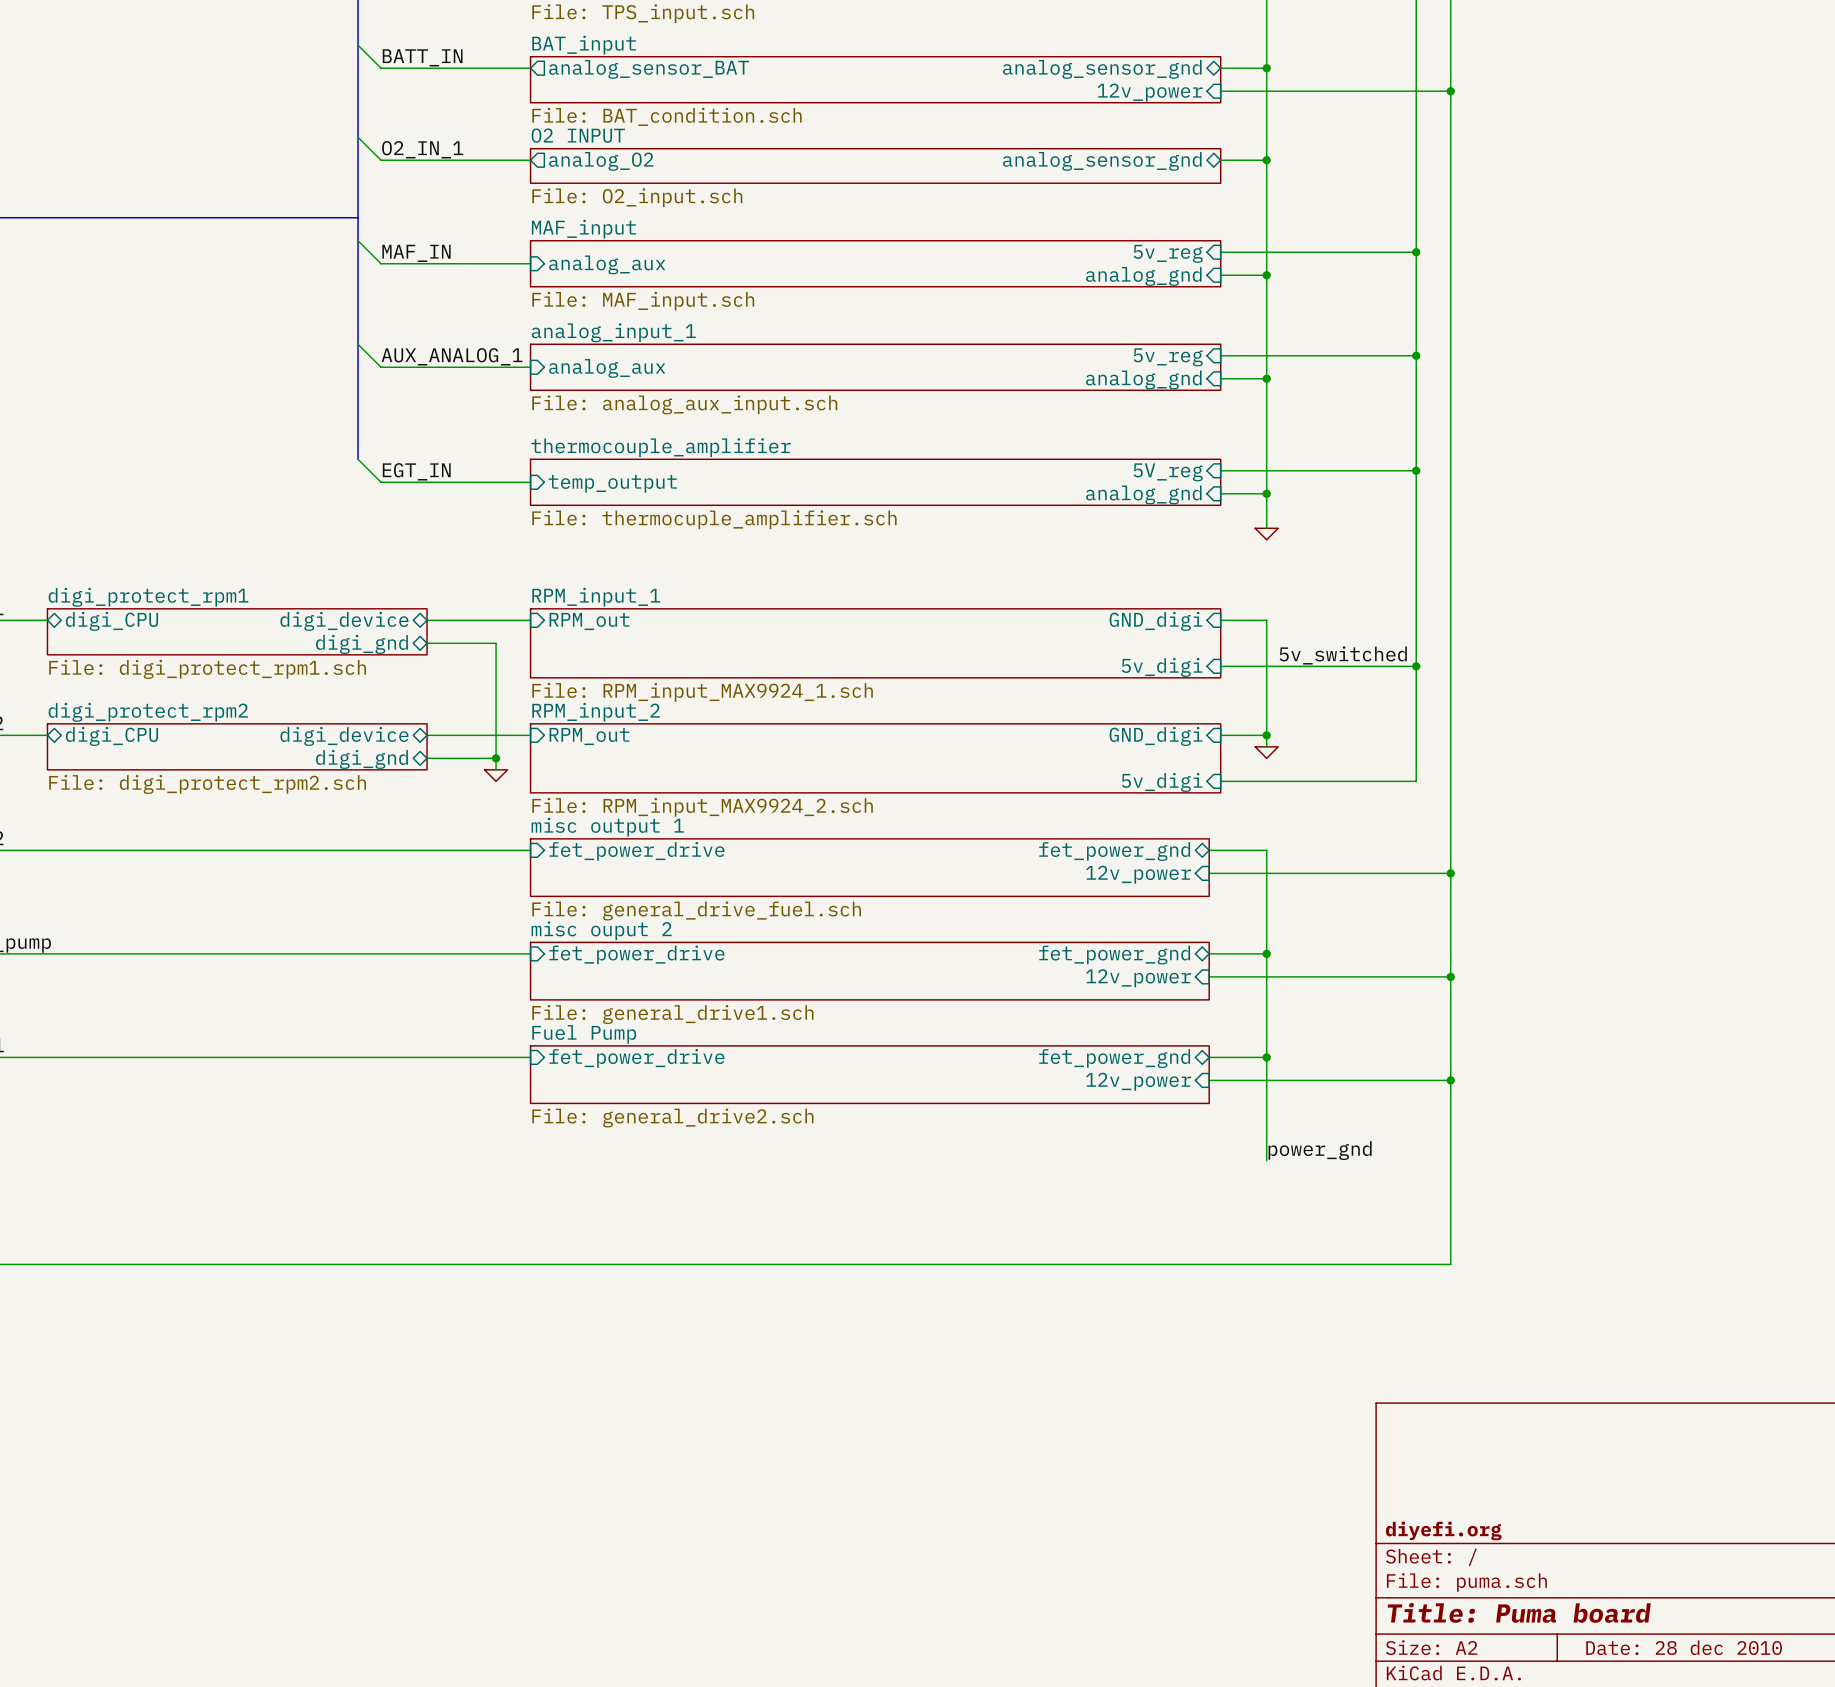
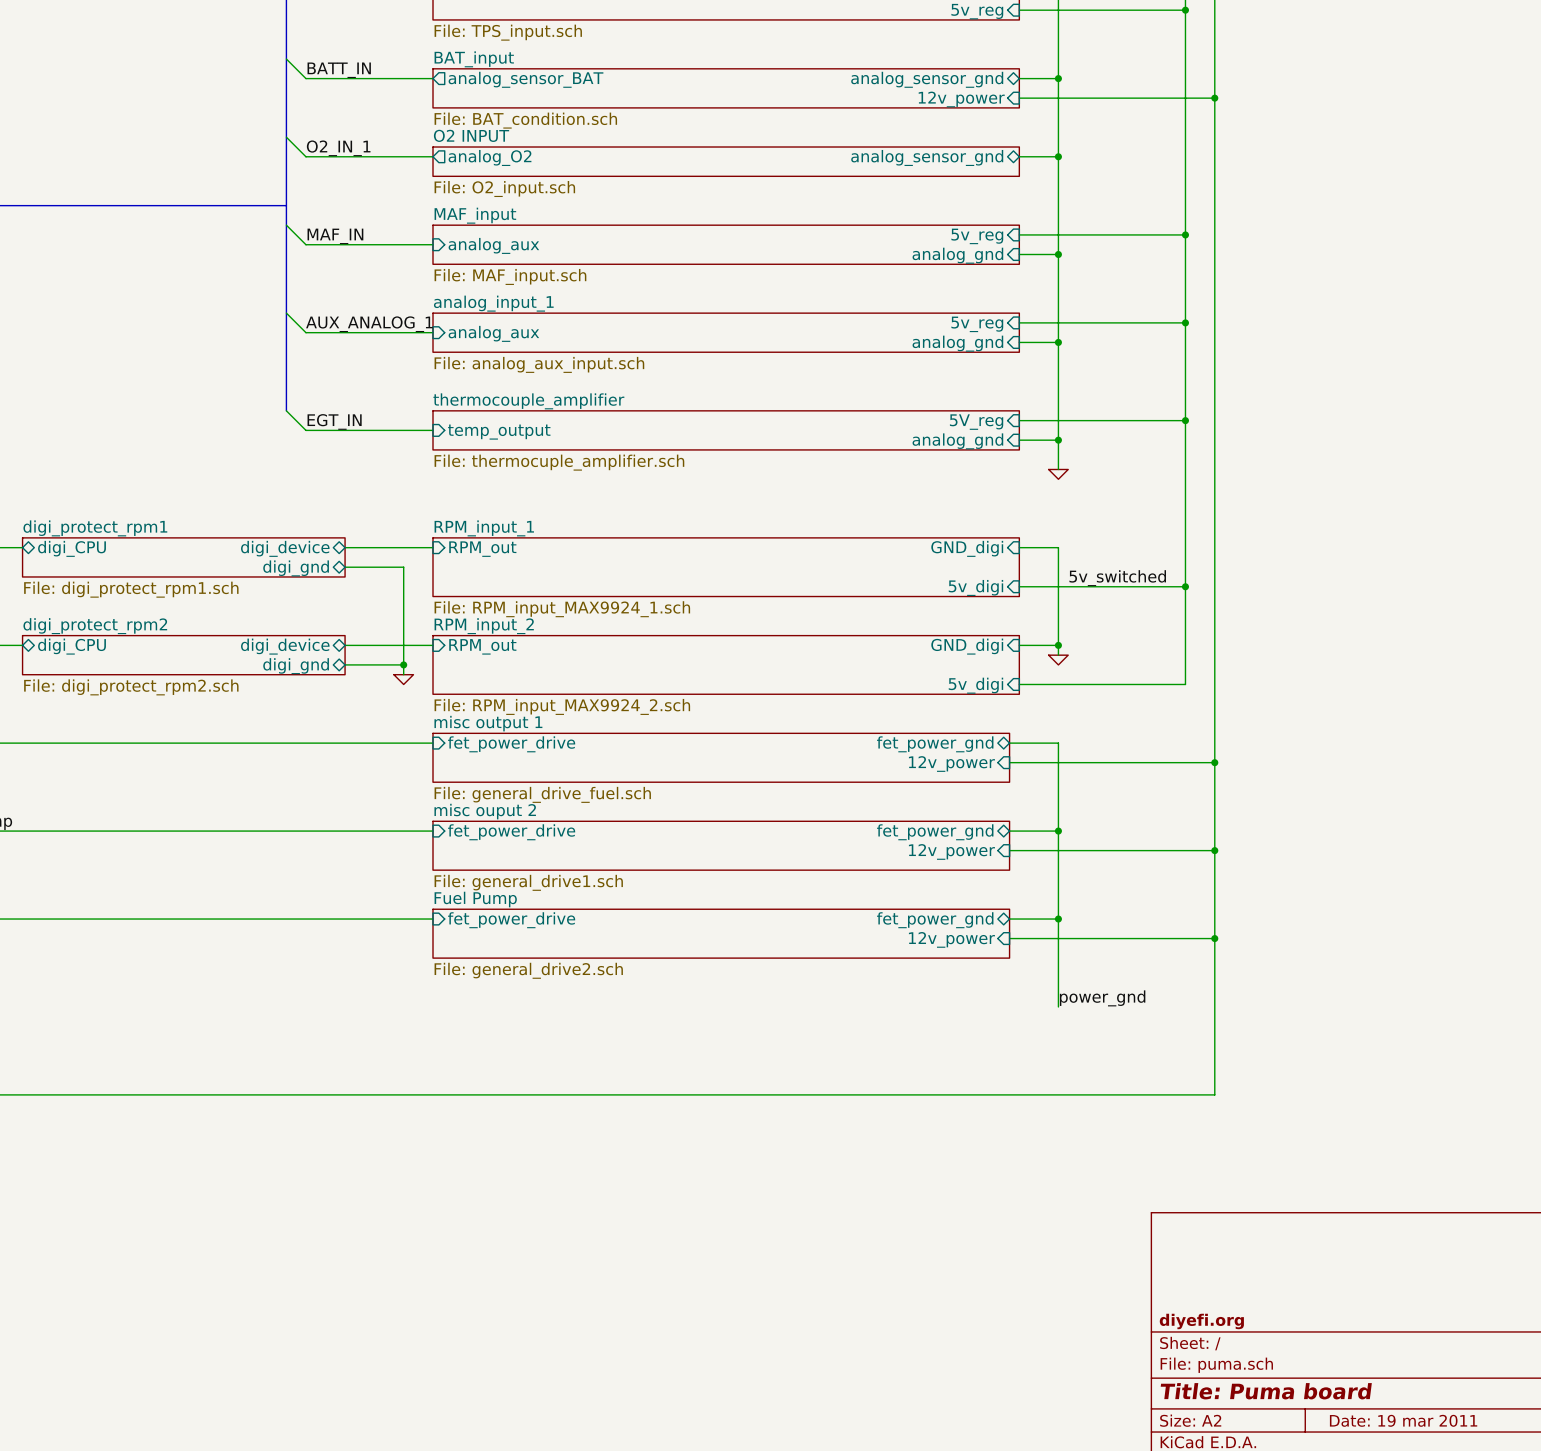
title block: Date: 28 dec 2010 (1684, 1647) -> Date: 19 mar 2011 (1403, 1420)

